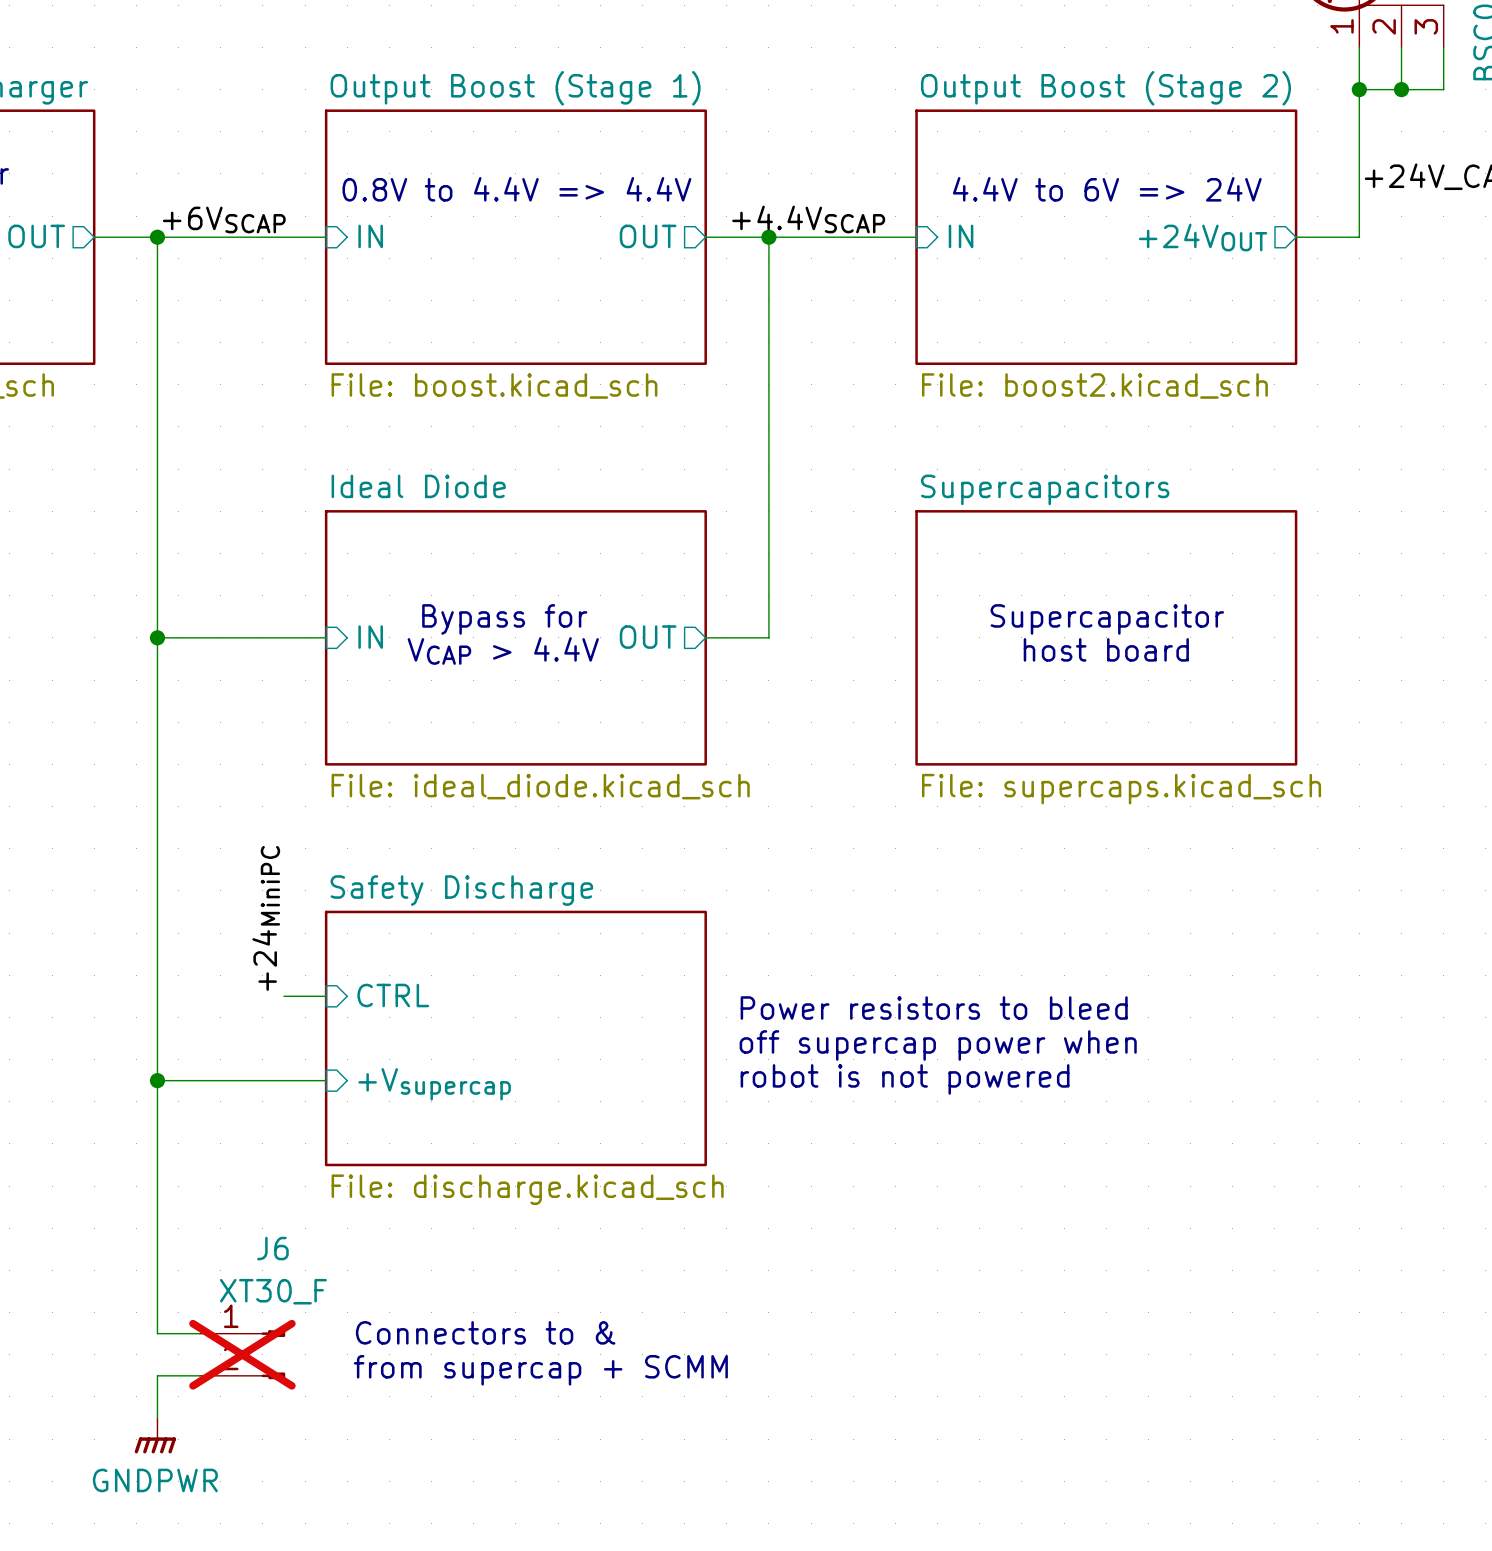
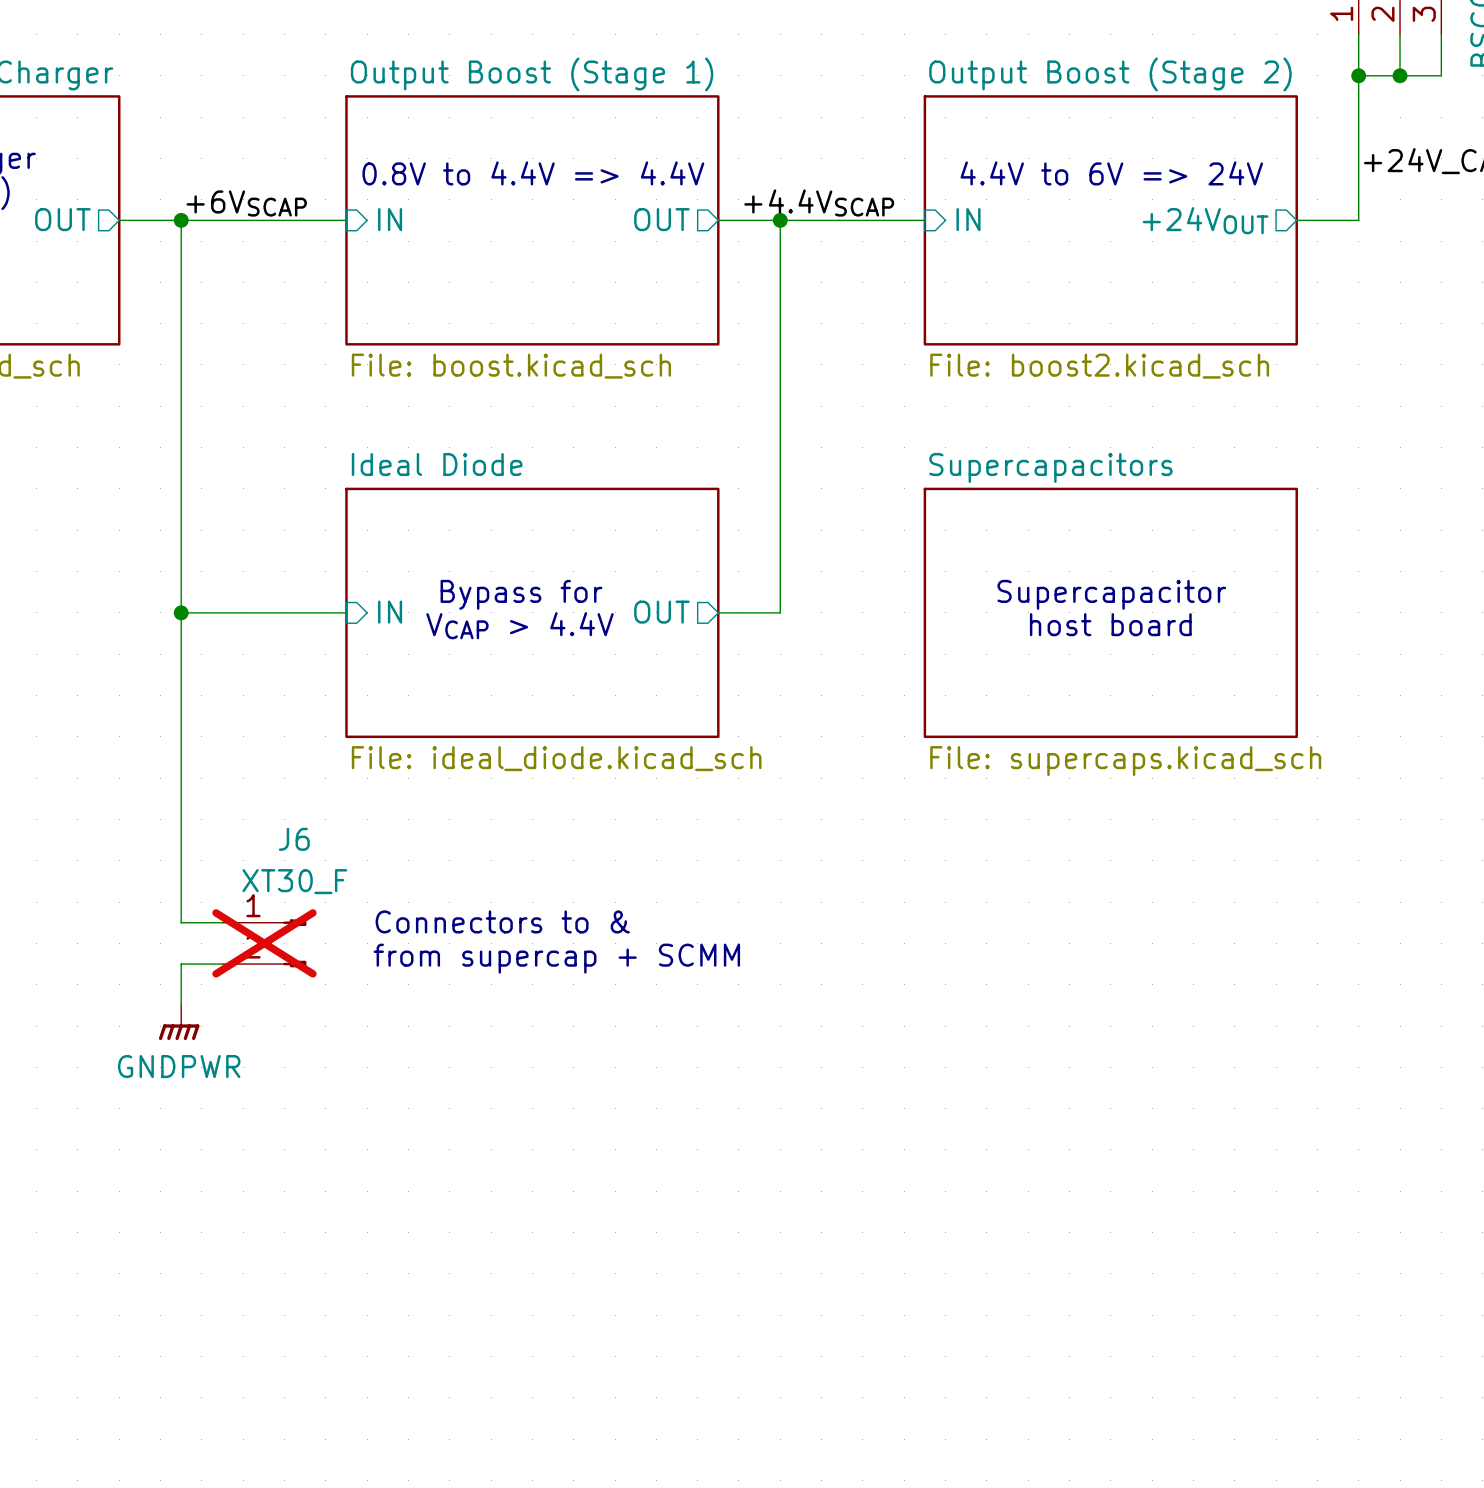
label: +24MiniPC (266, 918) -> none
wire: (157, 954) (157, 996) -> (181, 922) (222, 922)
sheet pin: CTRL (393, 995) -> none
wire: (283, 996) (326, 996) -> (181, 964) (222, 964)
text: Power resistors to bleed (934, 1008) -> none
wire: (157, 1038) (157, 1333) (199, 1333) -> none
sheet Safety Discharge: File: discharge.kicad_sch (515, 1038) -> none
text: off supercap power when (938, 1045) -> none
text: robot is not powered (905, 1079) -> none
wire: (157, 1080) (326, 1080) -> none
junction: (157, 1080) -> none
sheet pin: +Vsupercap (434, 1084) -> none
text position: Connectors to & (485, 1332) -> Connectors to & (502, 921)
J6 position: (242, 1354) -> (264, 943)
text position: from supercap + SCMM (540, 1370) -> from supercap + SCMM (556, 958)
wire: (199, 1375) (157, 1375) (157, 1418) -> none
power symbol position: GNDPWR (155, 1435) -> GNDPWR (179, 1022)

